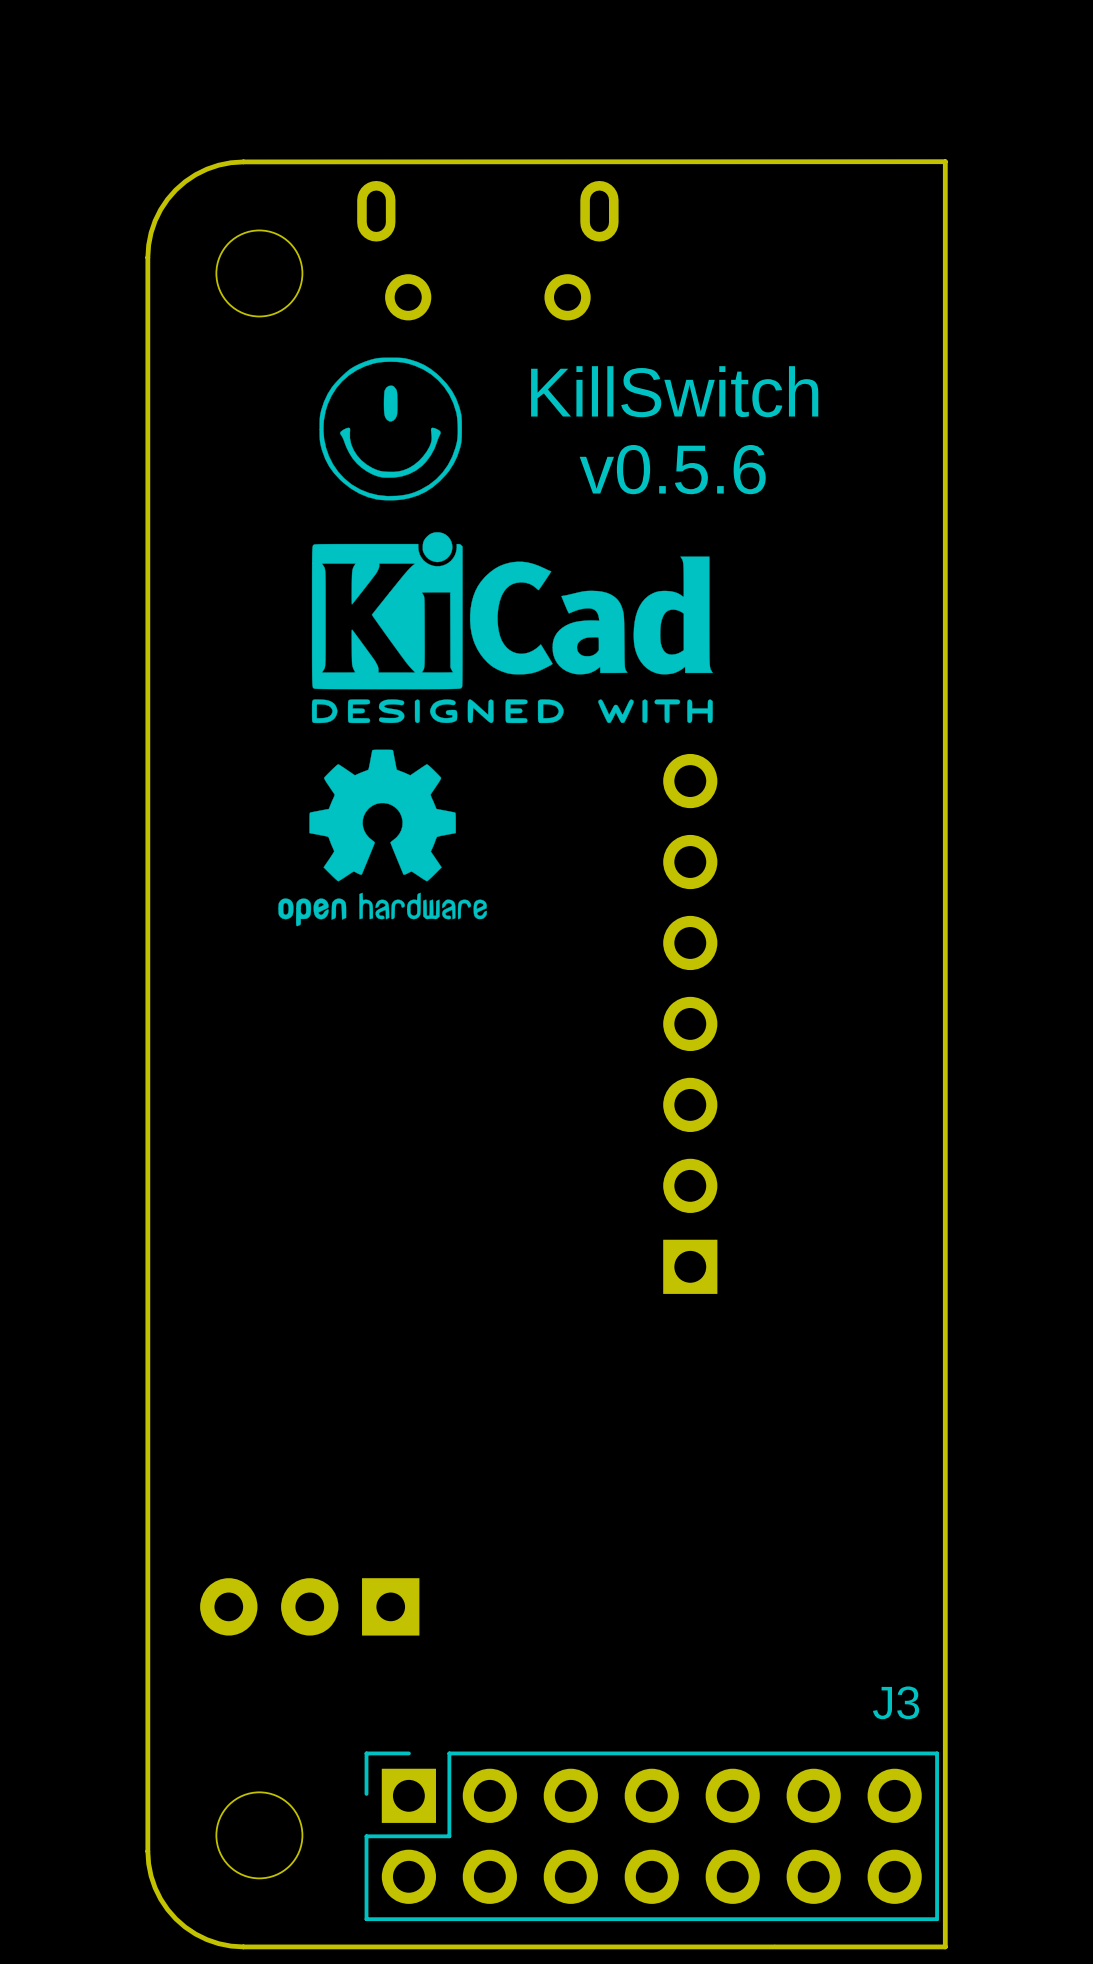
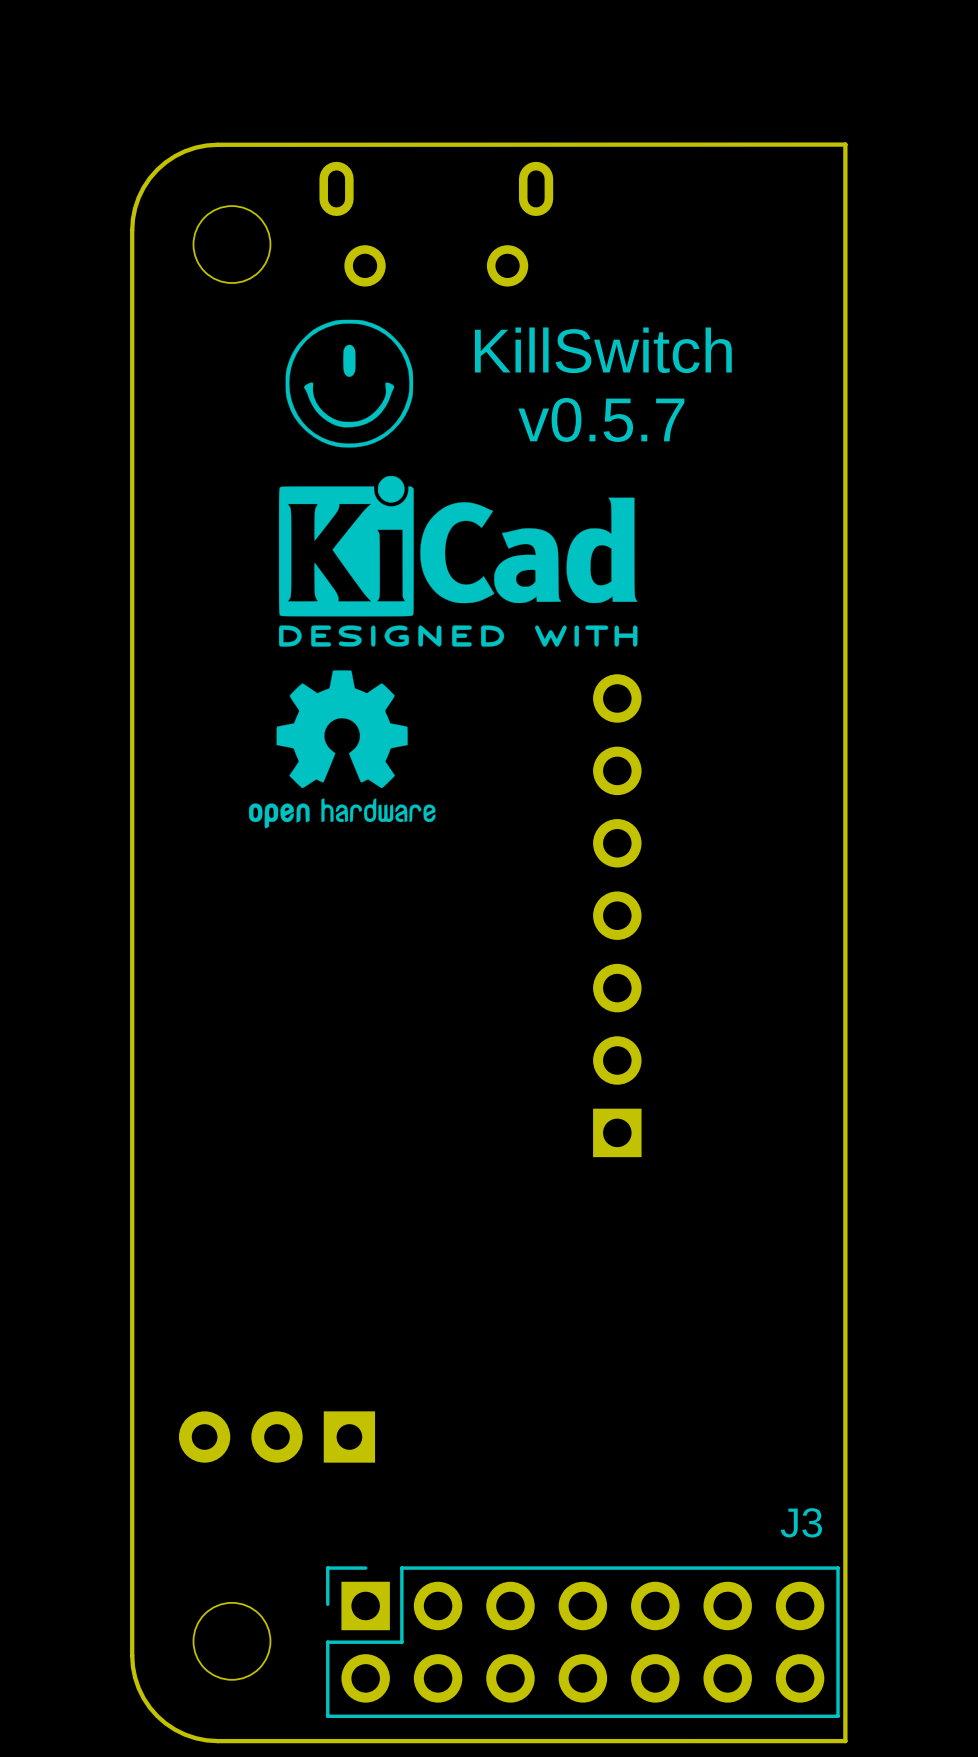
text: v0.5.6 (672, 469) -> v0.5.7 (601, 419)

